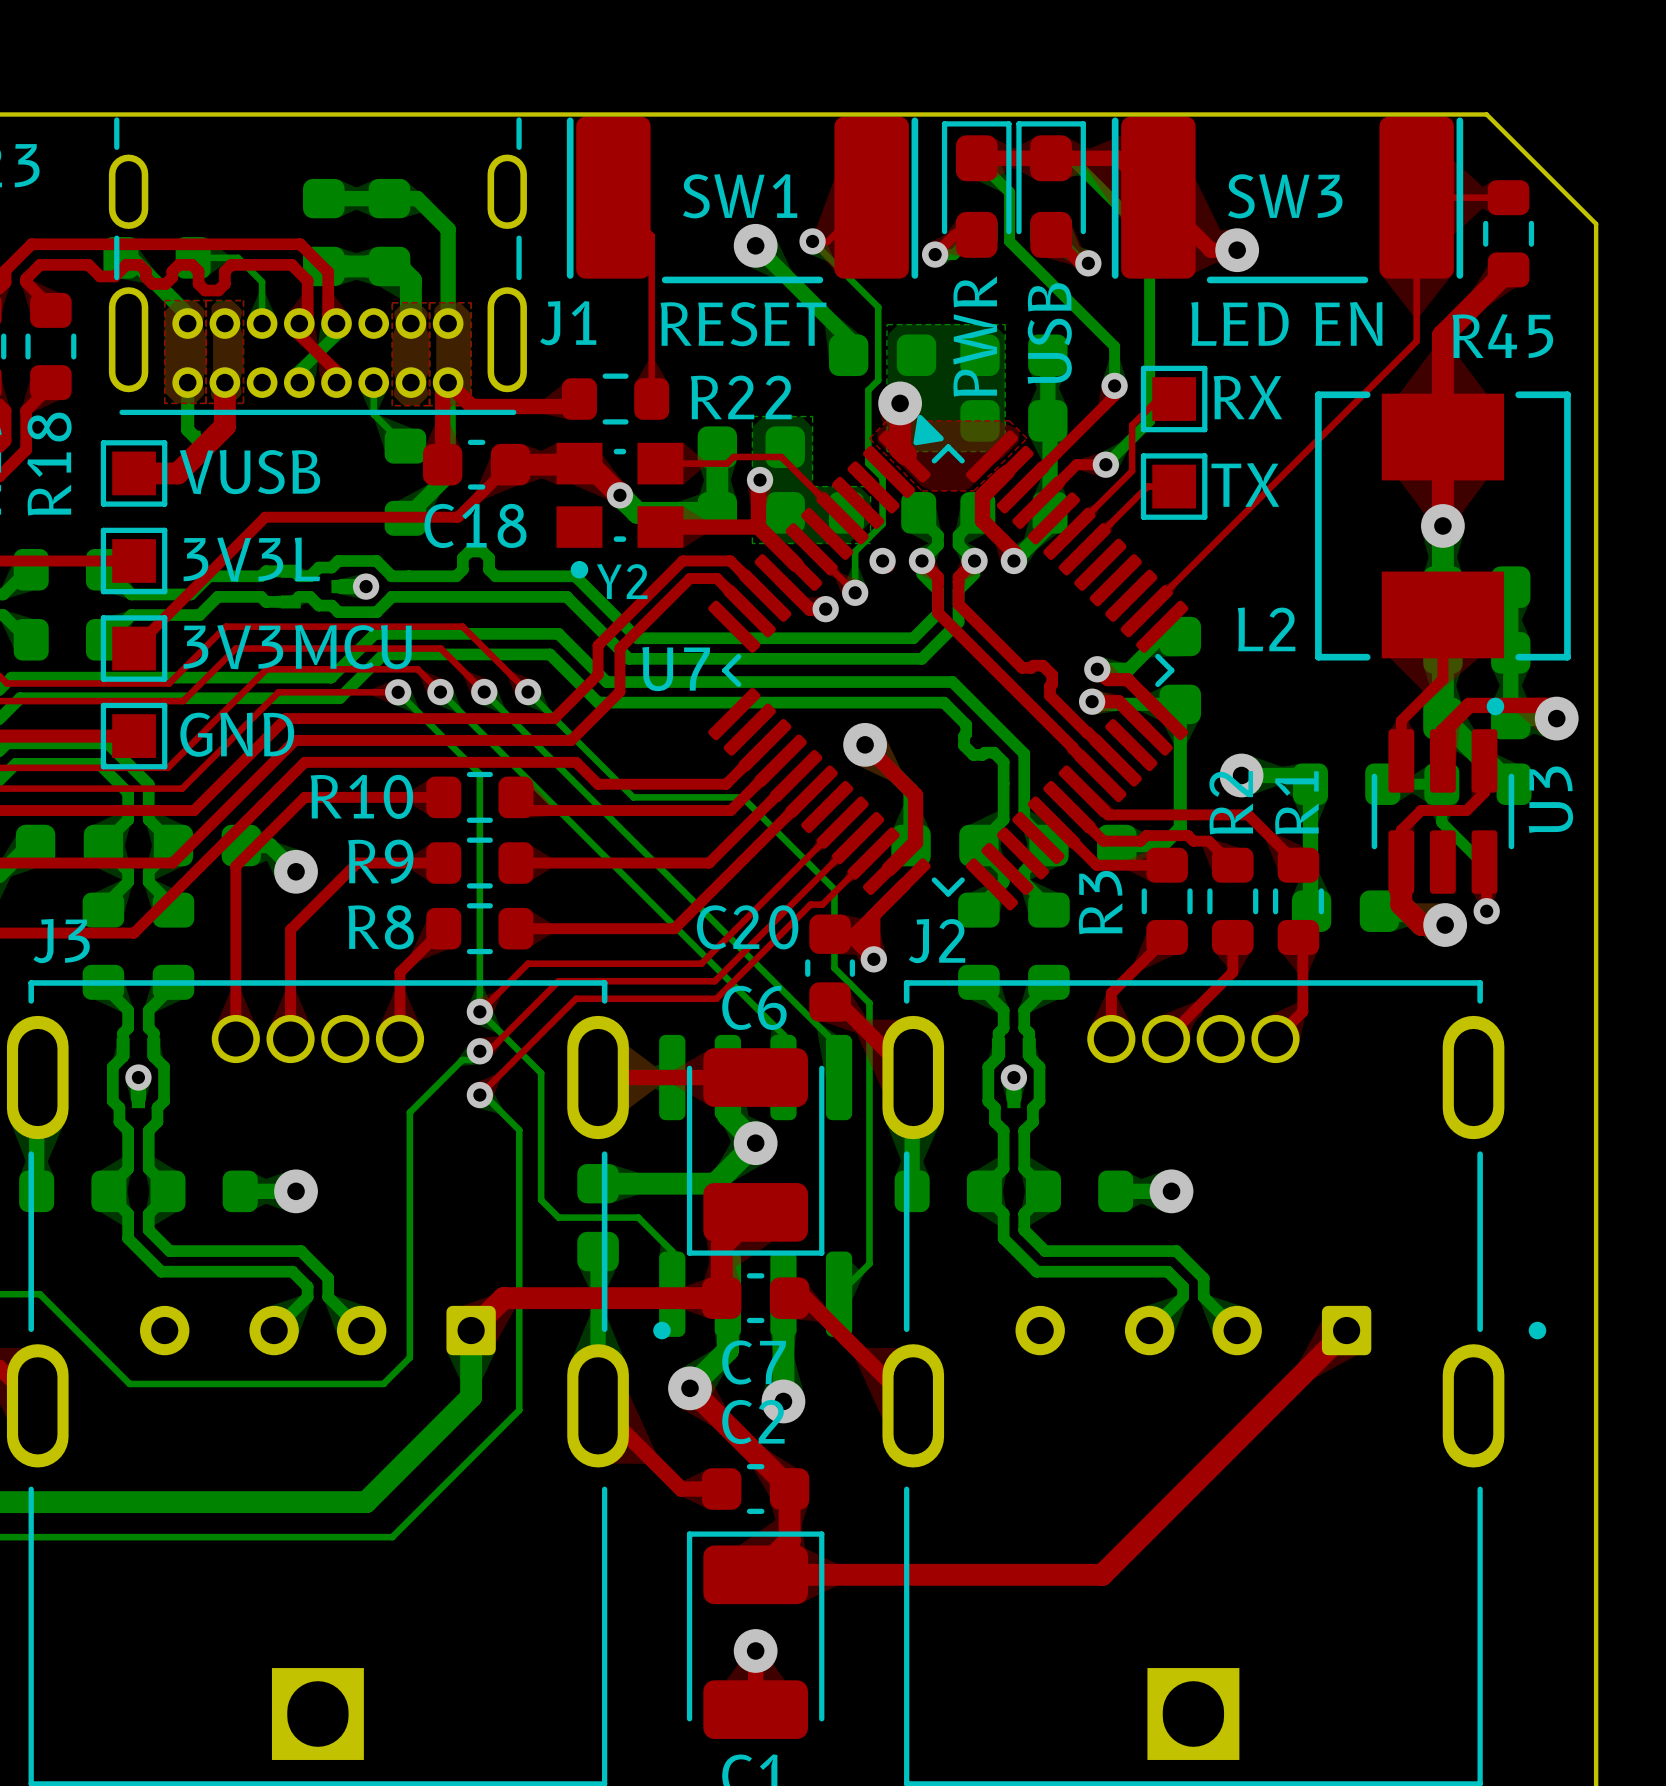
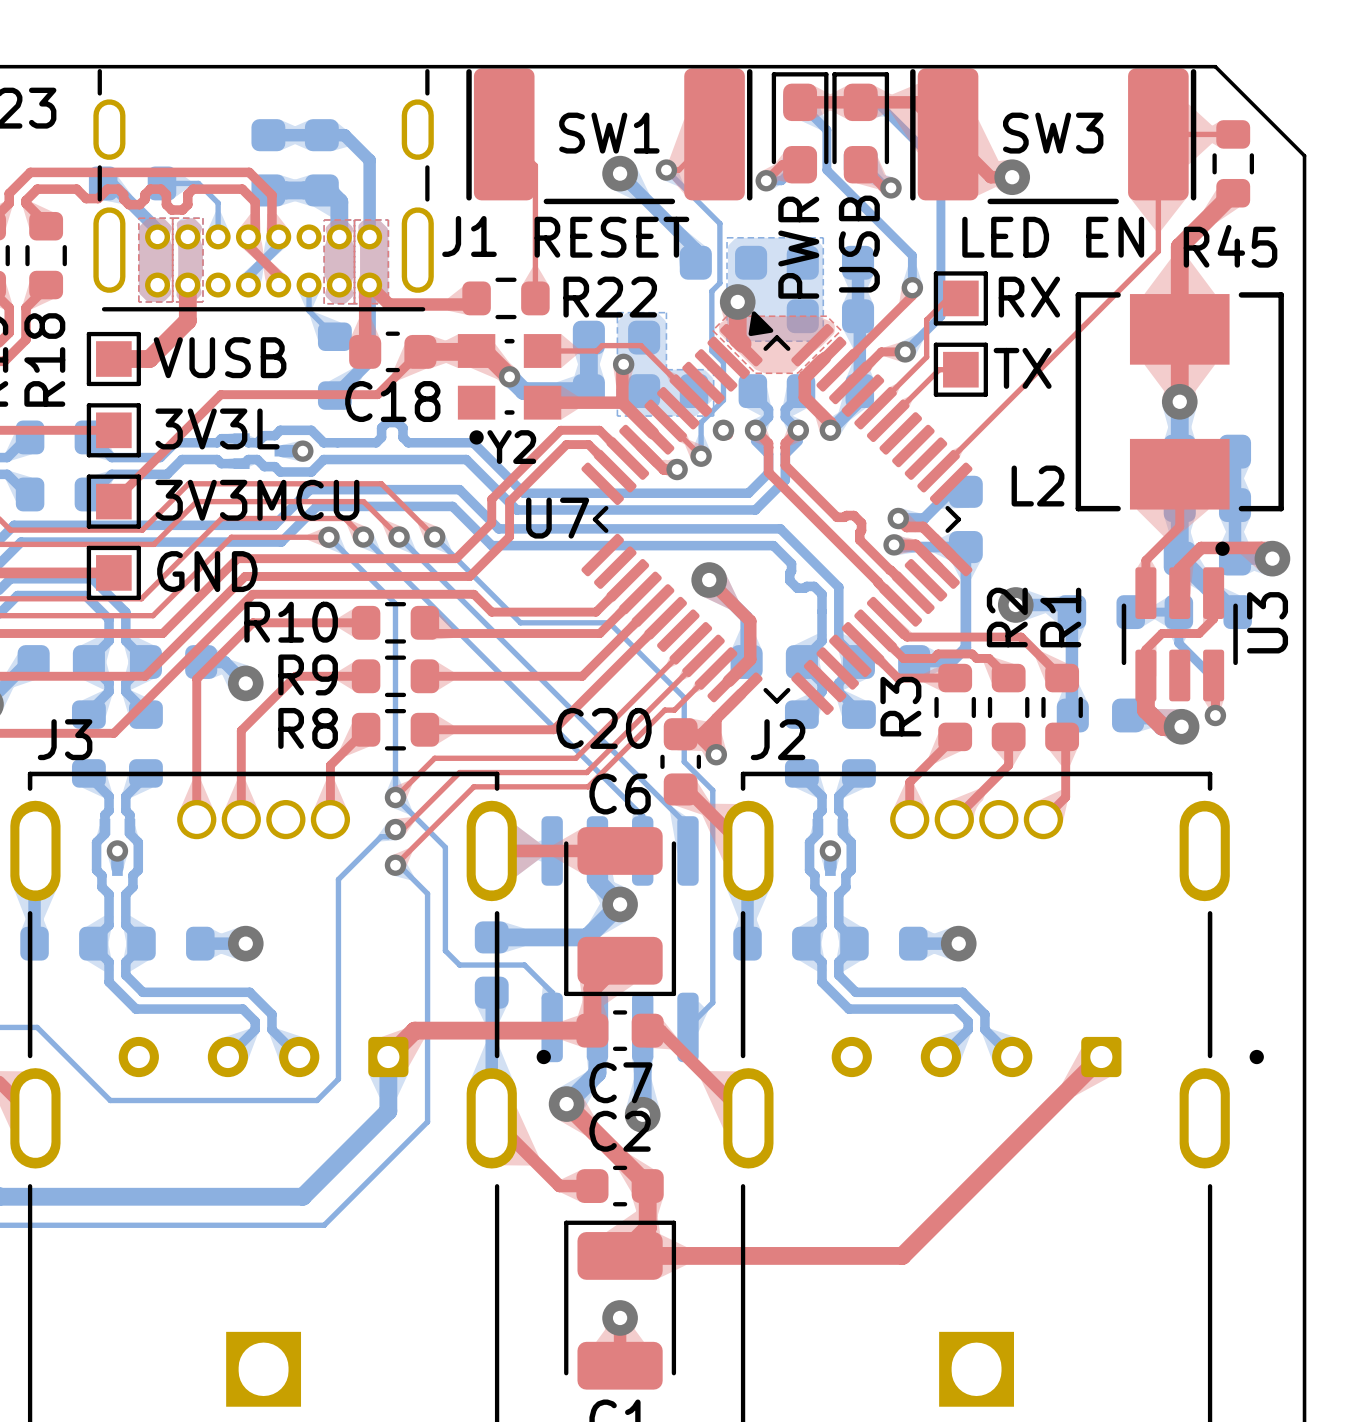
bottom track: (187, 382) (187, 429) (196, 438) -> none

